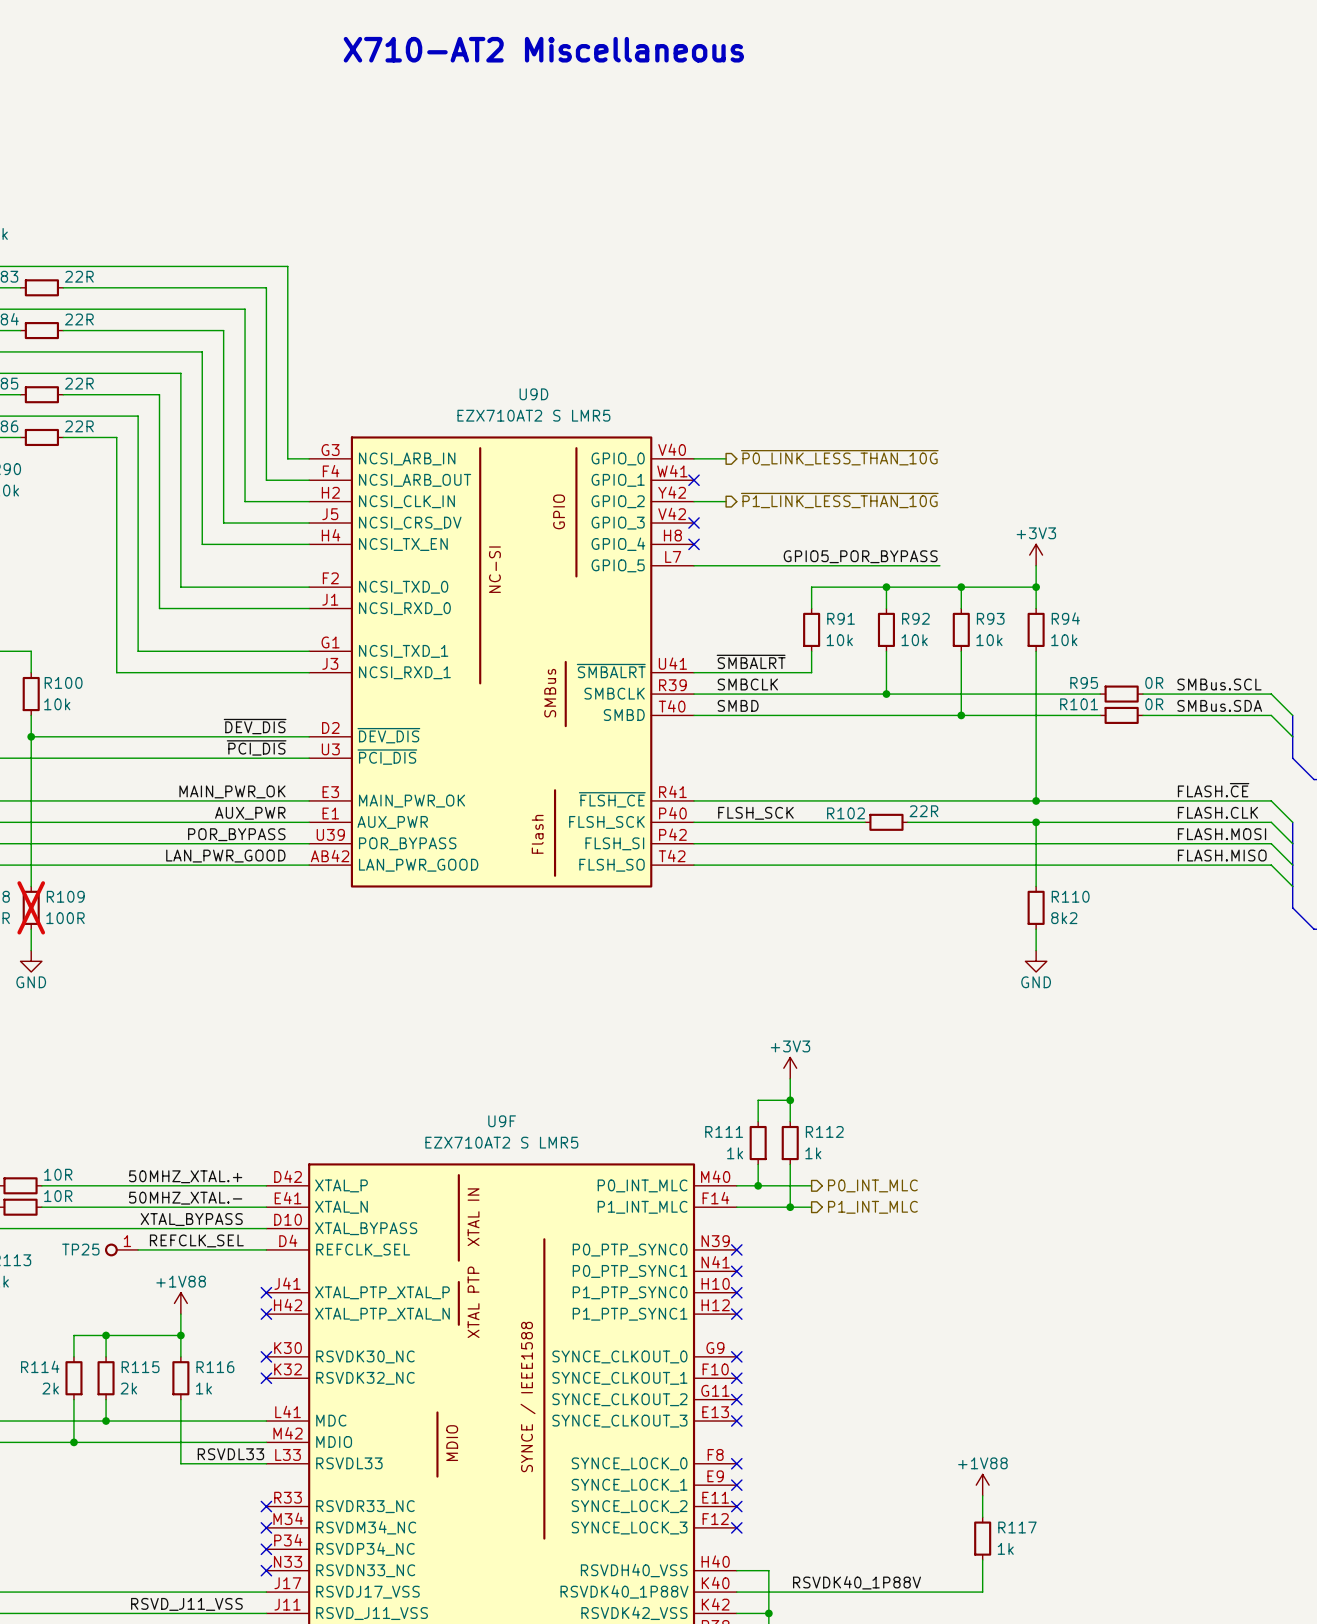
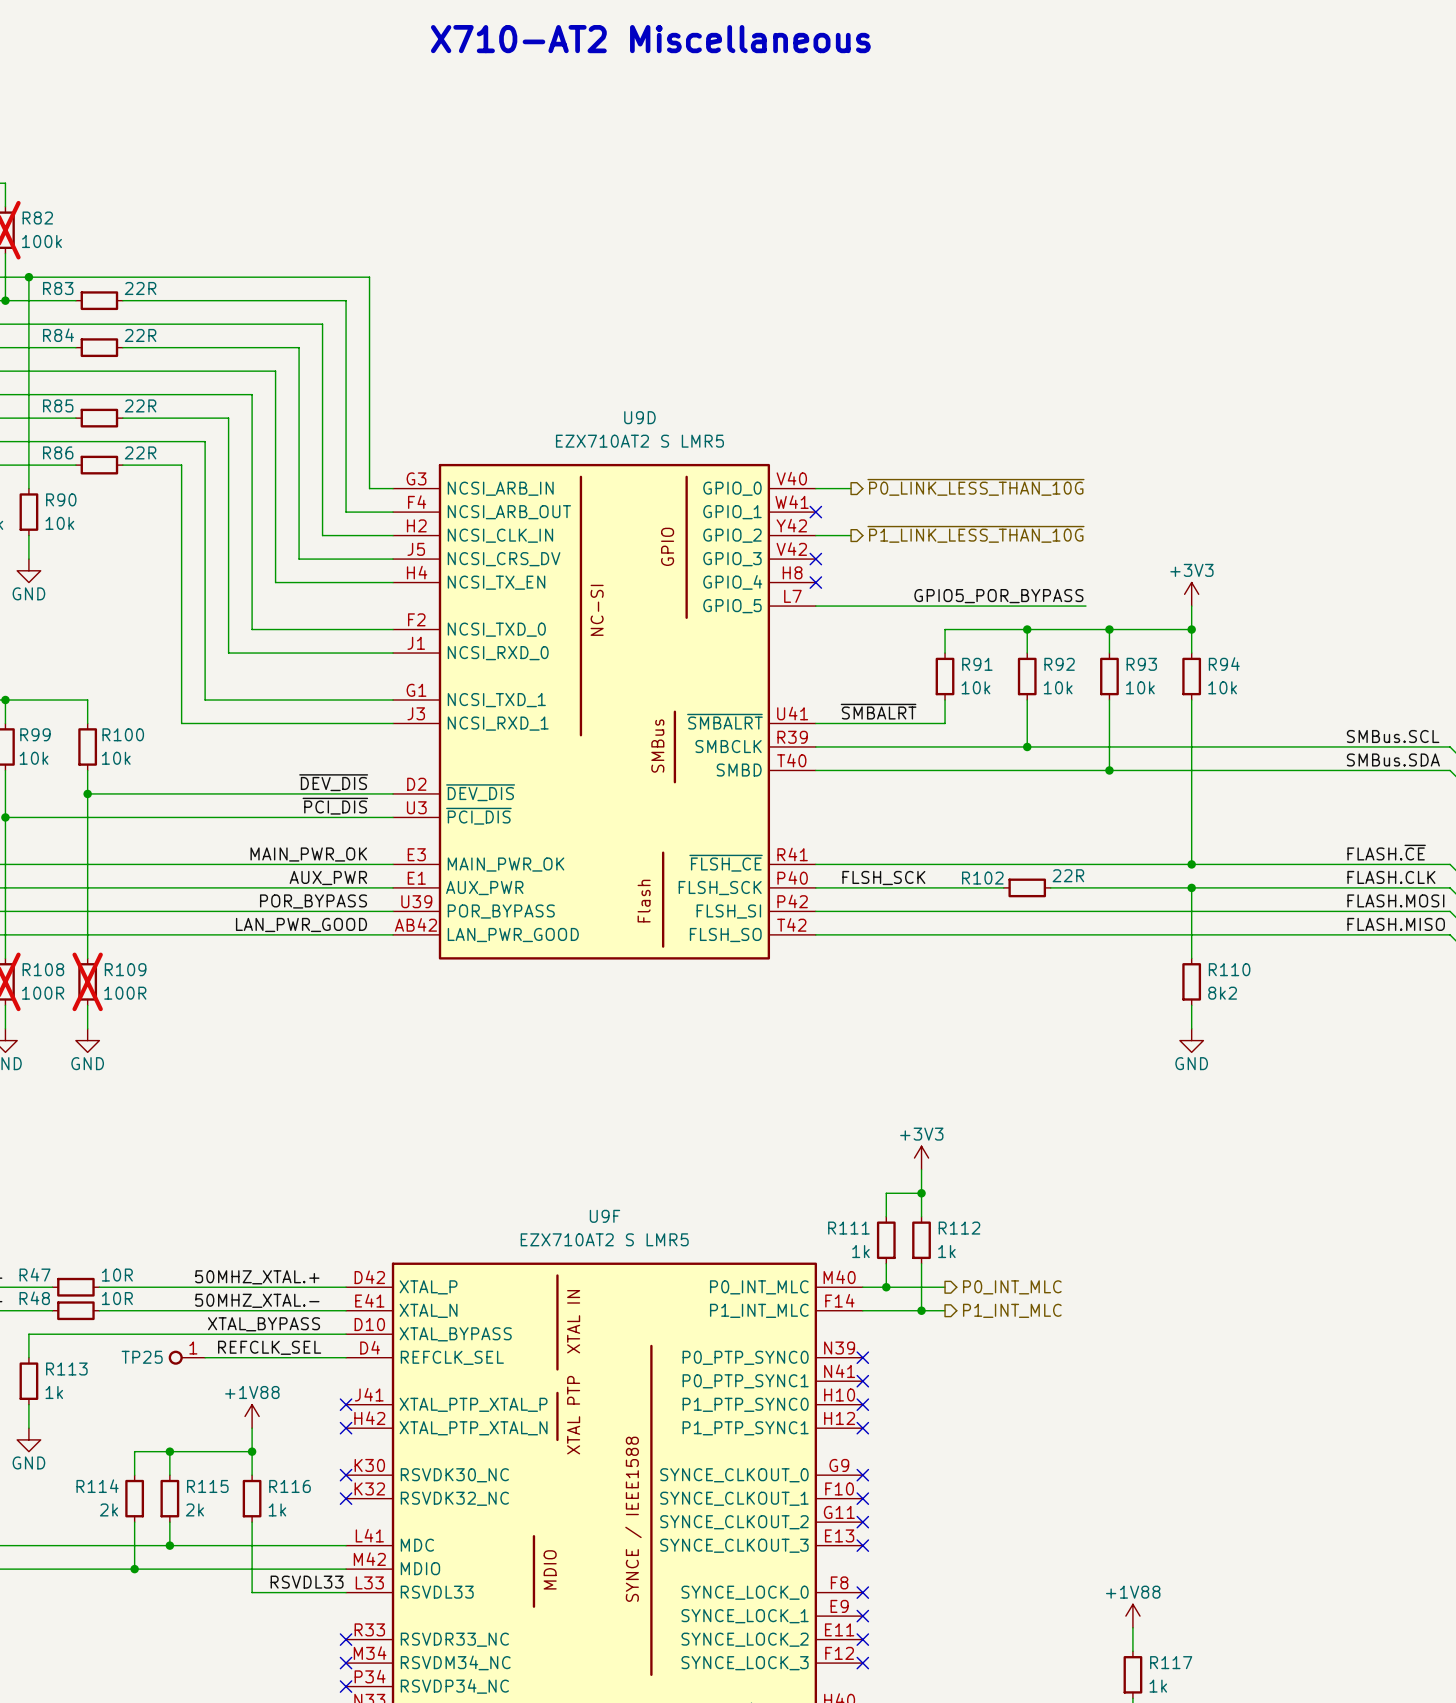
label: SMBCLK (747, 684) -> none
wire: none -> (1262, 746) (1309, 746)
R95: (1121, 694) -> none
label: SMBD (738, 705) -> none
wire: none -> (1262, 770) (1309, 770)
R101: (1121, 715) -> none

